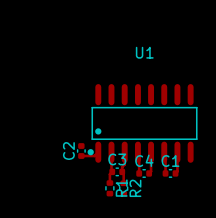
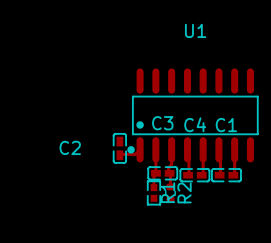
C2 footprint: [76, 143, 86, 159] -> [112, 132, 128, 164]
C2 name position: C2 (68, 151) -> C2 (70, 147)
C3 name position: C3 (117, 159) -> C3 (162, 123)
C4 name position: C4 (144, 160) -> C4 (195, 124)
C1 name position: C1 (170, 161) -> C1 (226, 125)
C3 footprint: [109, 167, 126, 177] -> [147, 166, 179, 181]
C4 footprint: [136, 169, 153, 178] -> [179, 168, 211, 183]
C1 footprint: [162, 169, 179, 178] -> [210, 168, 242, 183]
R1 footprint: [105, 180, 115, 197] -> [146, 180, 162, 206]

